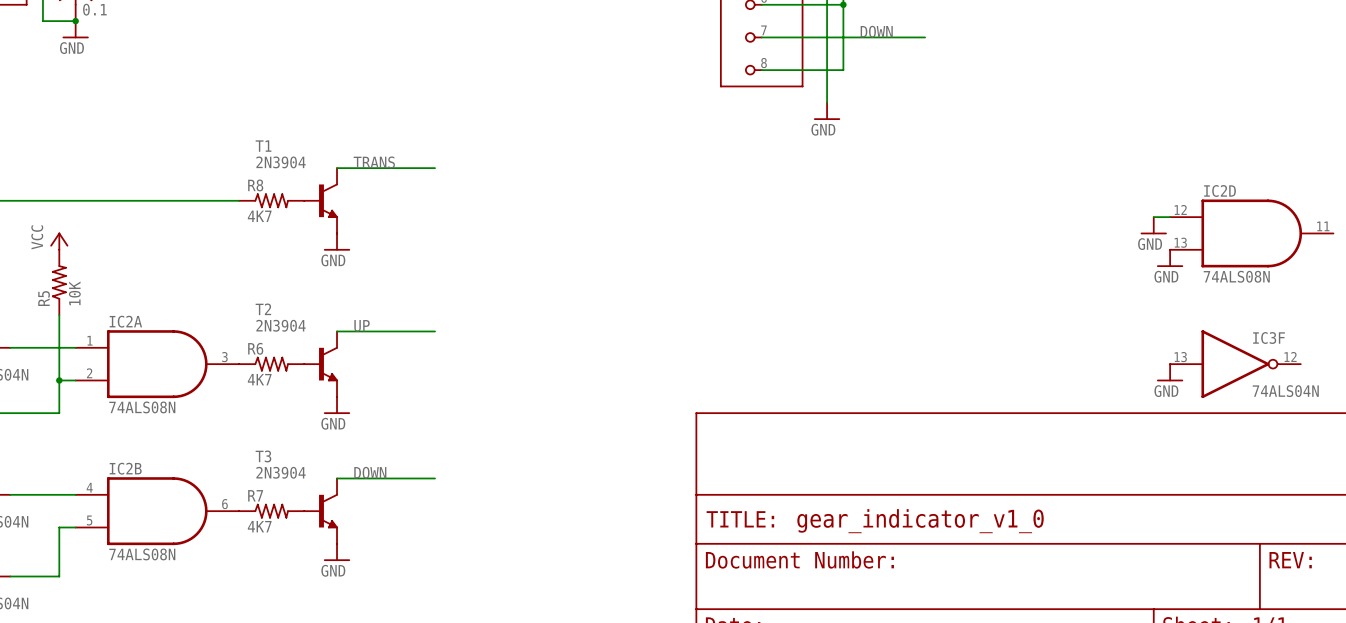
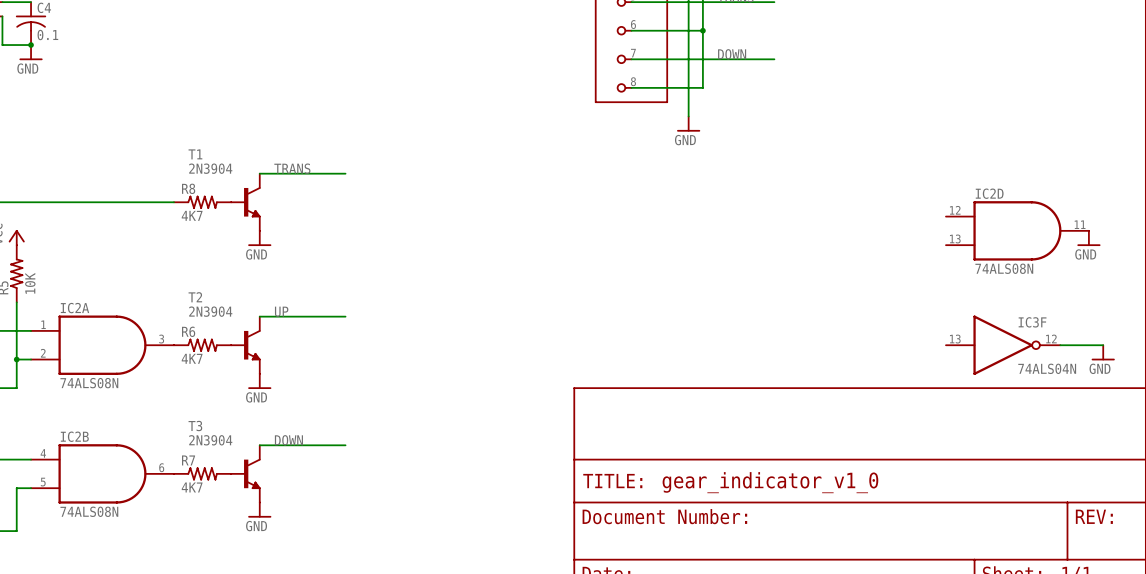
wire: (1153, 217) (1170, 217) -> none
power symbol: GND (1153, 225) -> none
IC2D position: (1251, 233) -> (1017, 230)
power symbol: none -> GND (1088, 238)
power symbol: GND (1170, 258) -> none
IC3F position: (1235, 364) -> (1003, 345)
power symbol: GND (1170, 372) -> none
power symbol: none -> GND (1103, 352)

